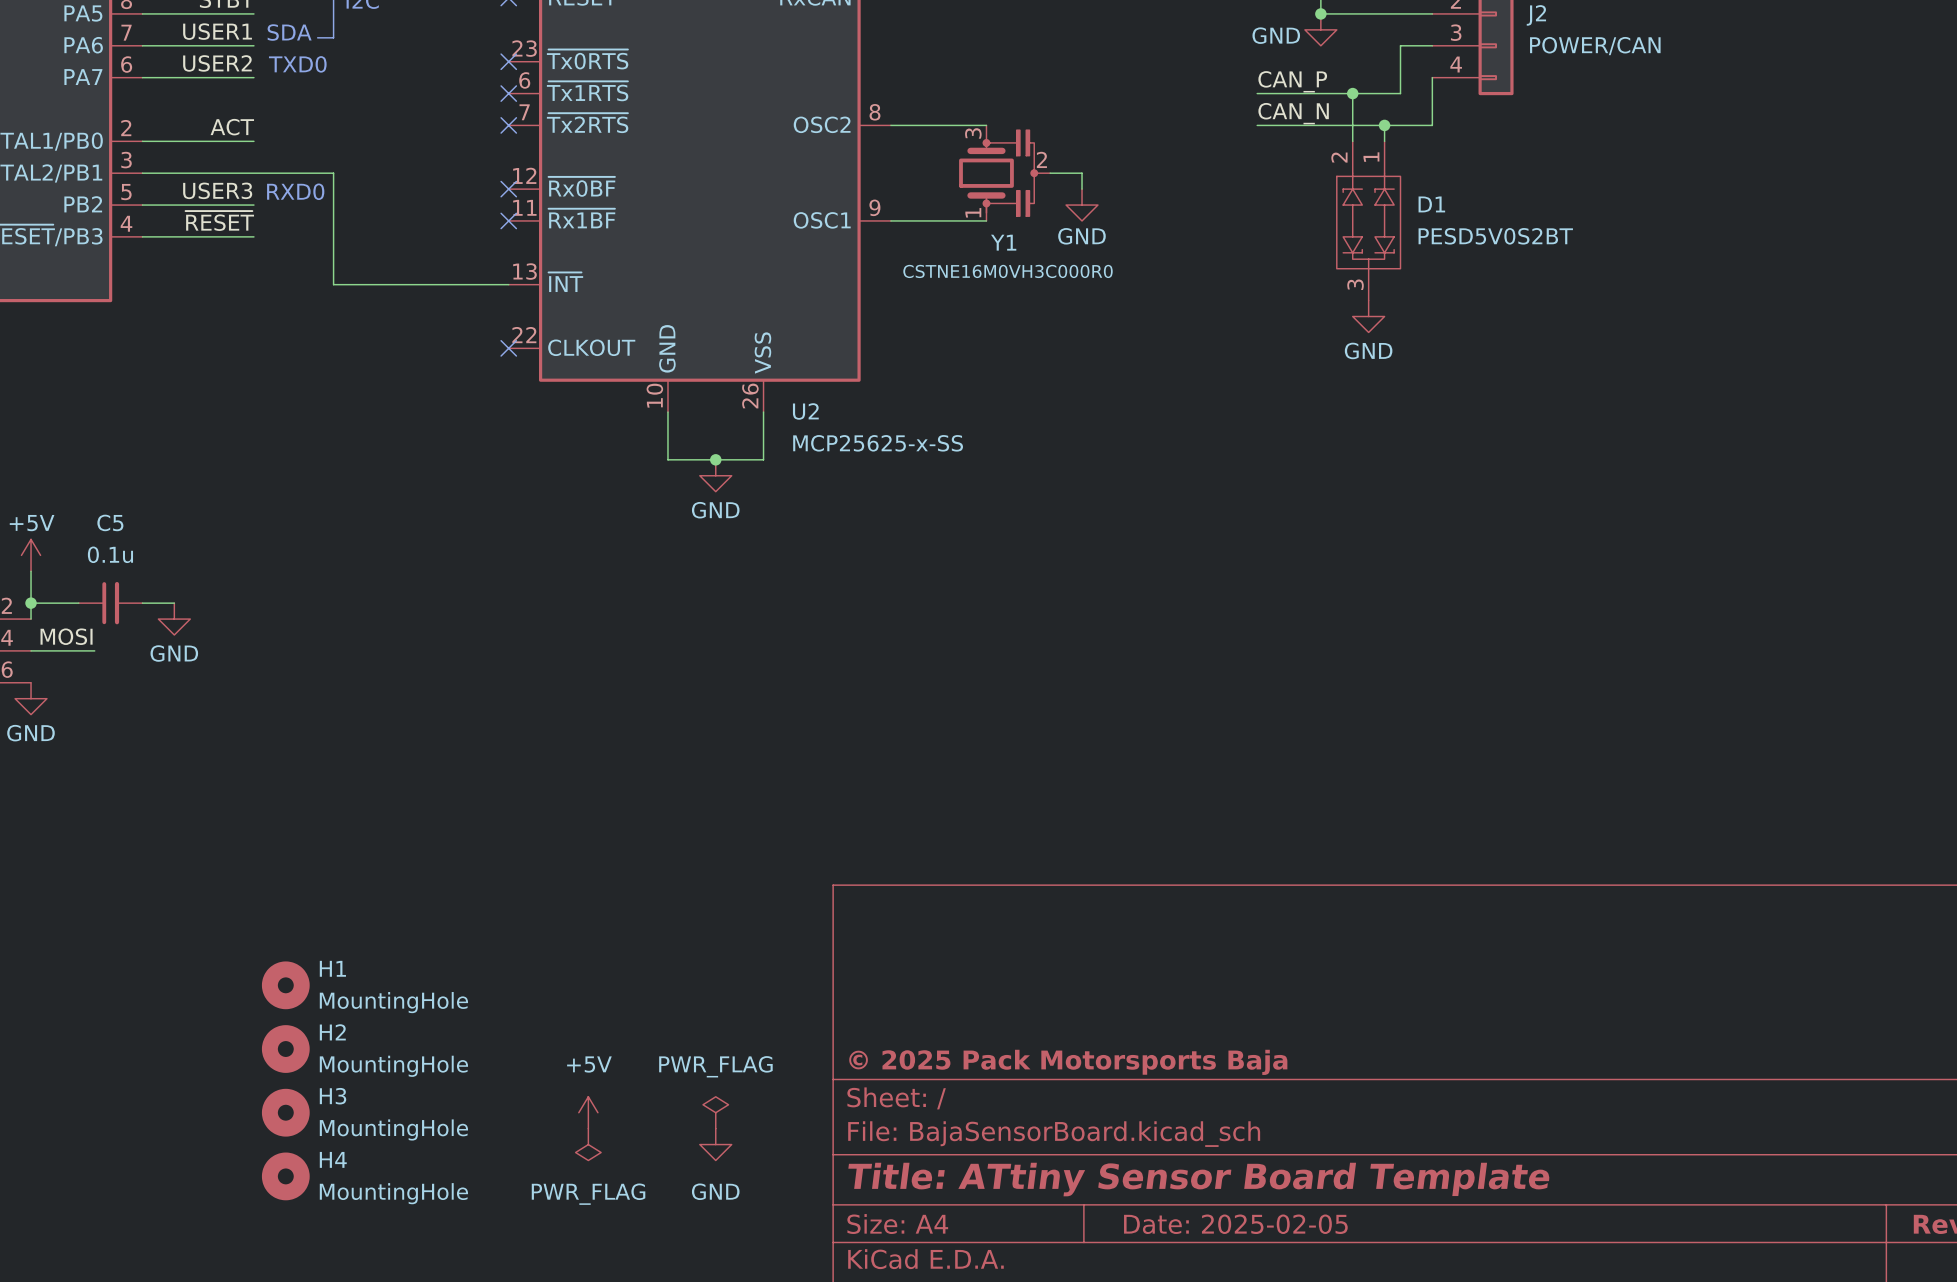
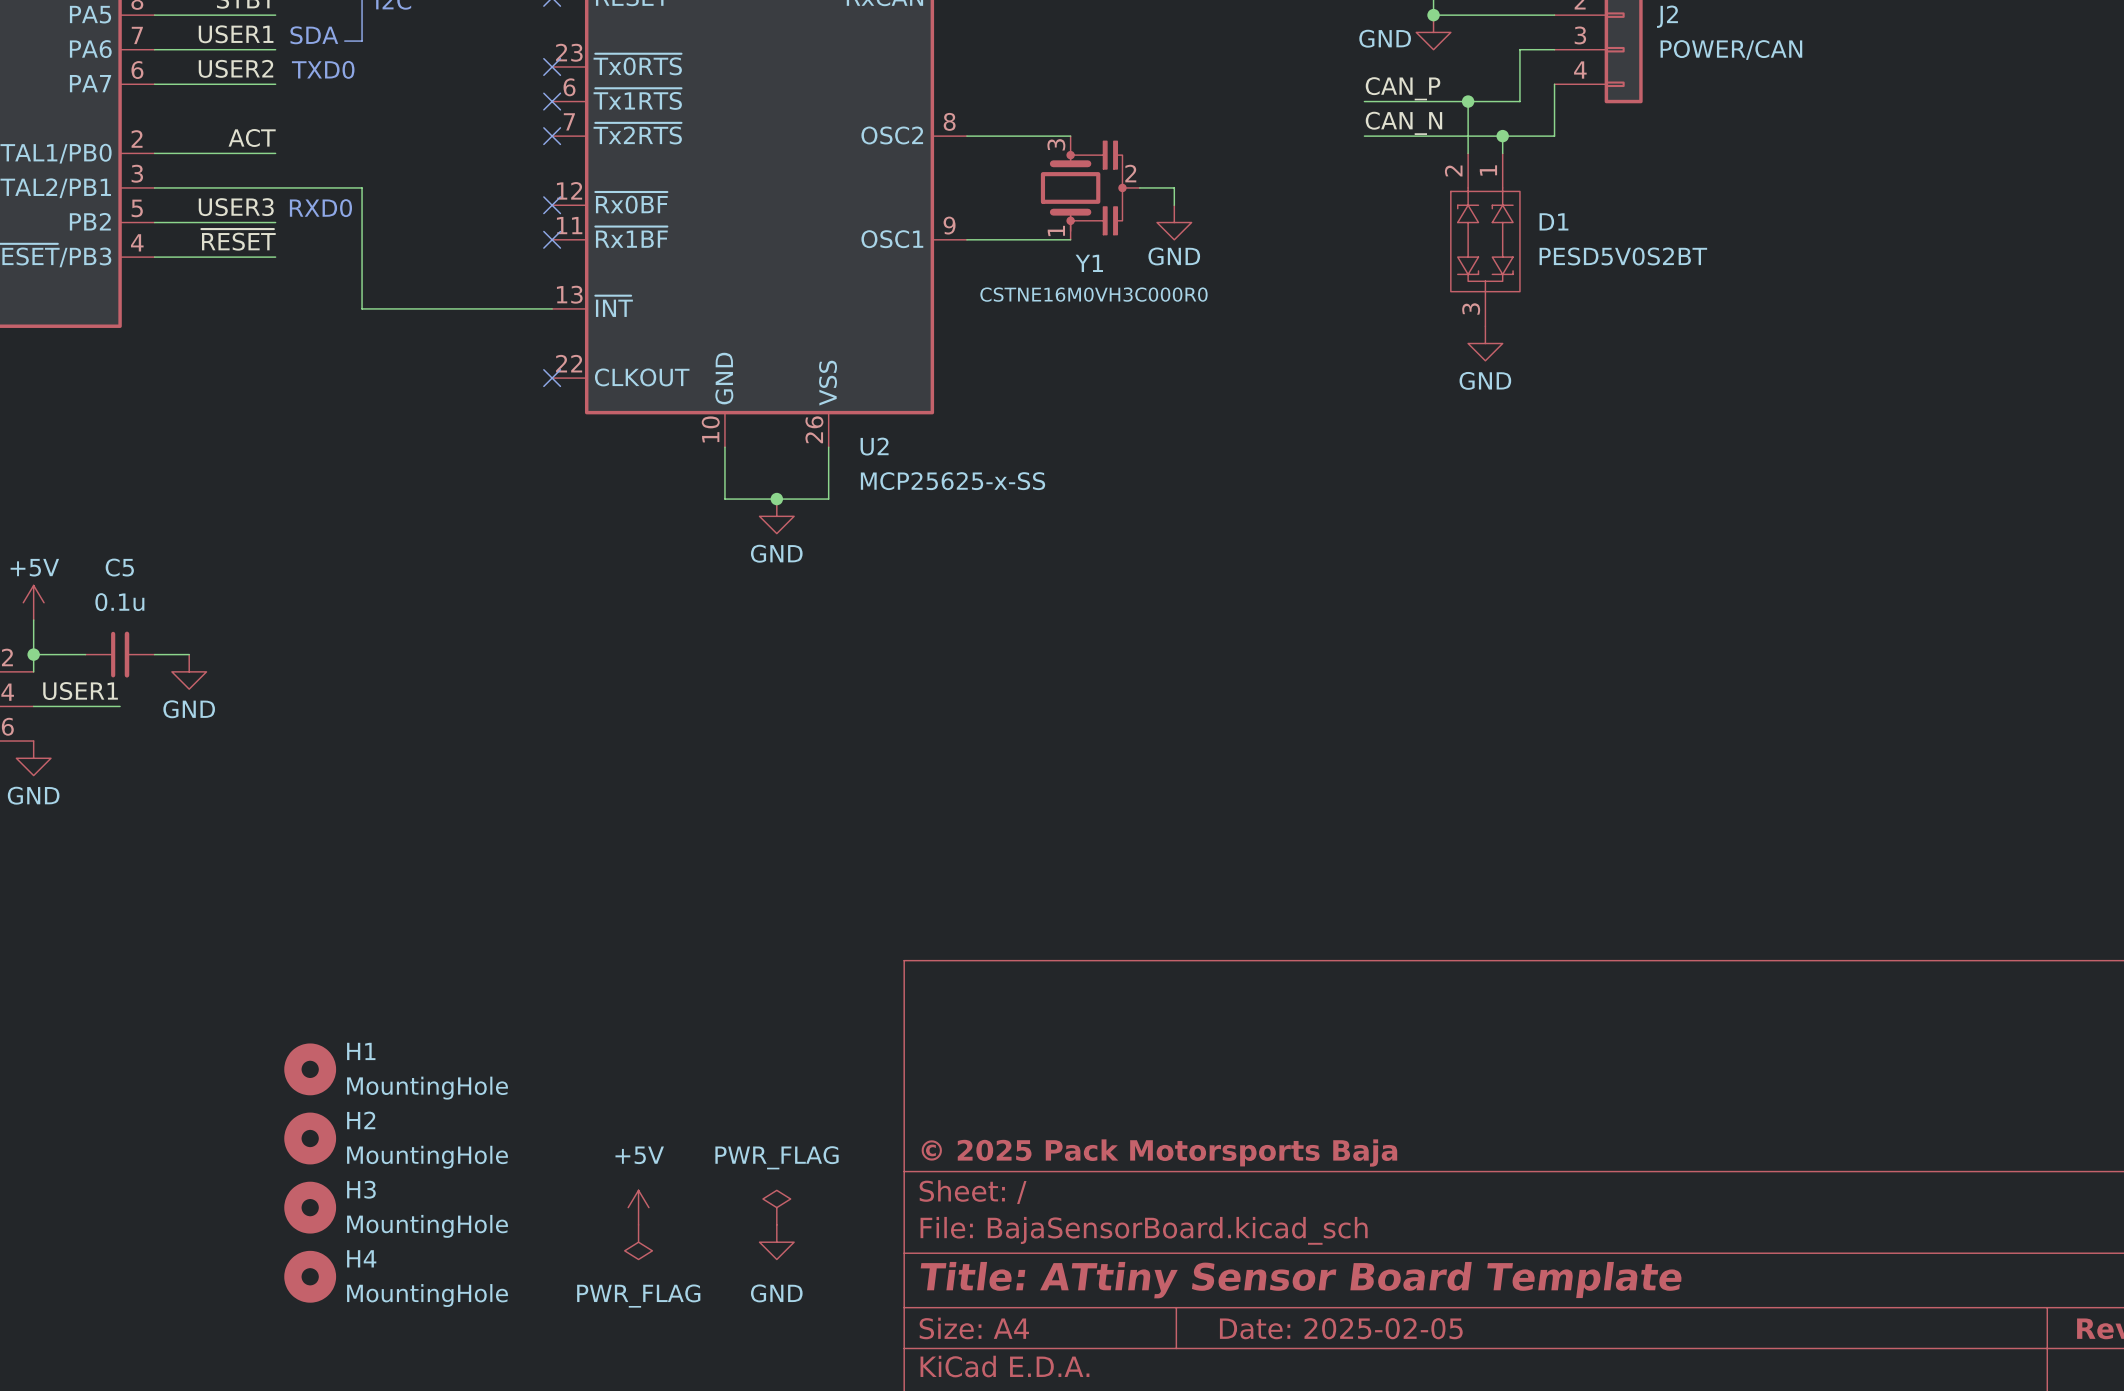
label: MOSI (66, 636) -> none
label: none -> USER1 (80, 691)
wire: none -> (102, 706) (120, 706)

